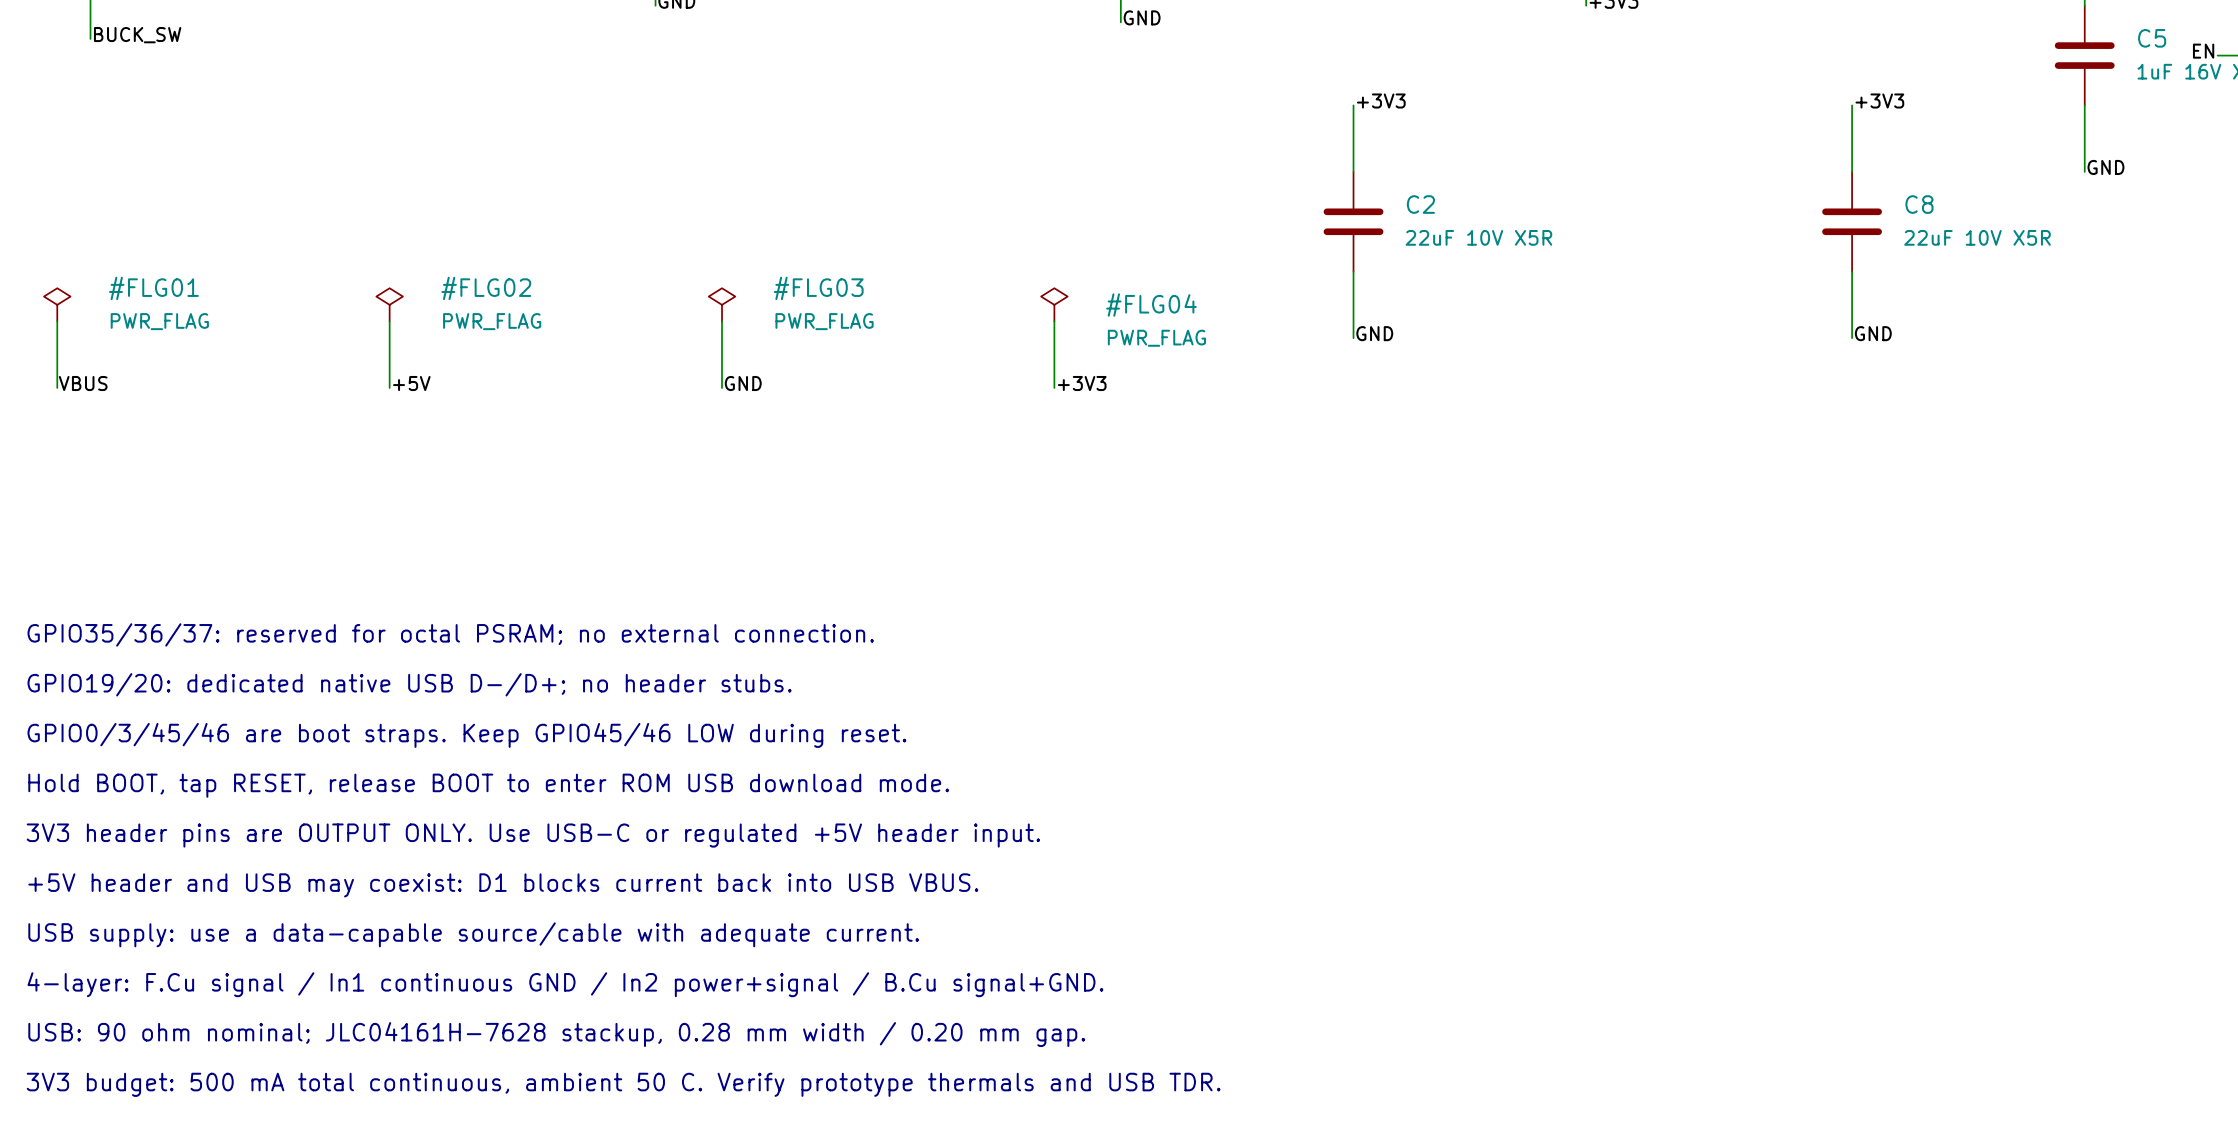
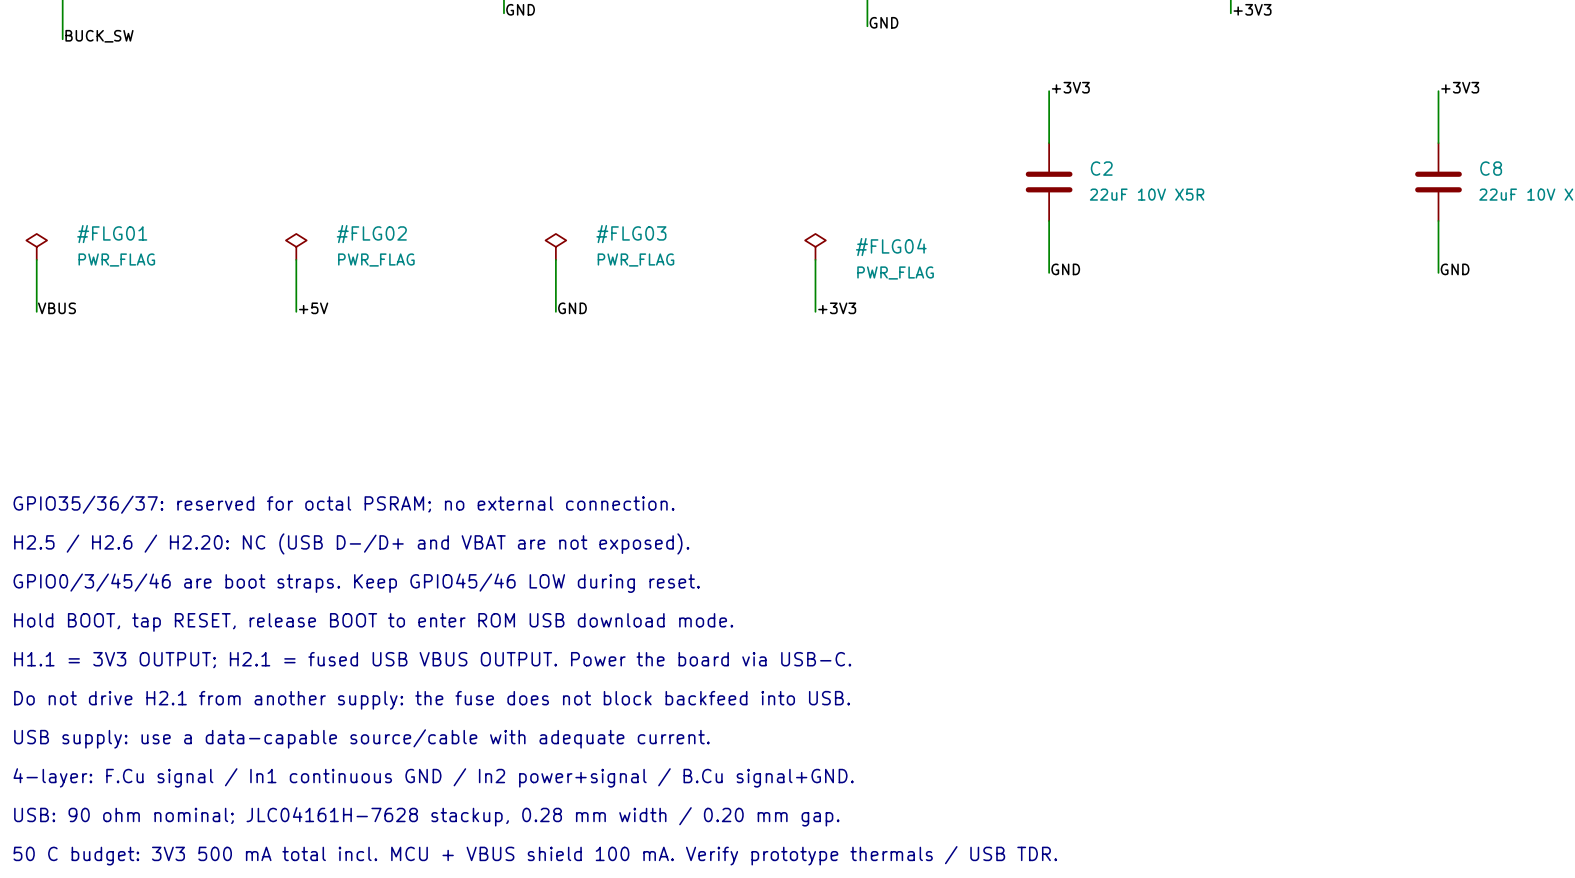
text: GPIO19/20: dedicated native USB D-/D+; no header stubs. (409, 684) -> H2.5 / H2.6 / H2.20: NC (USB D-/D+ and VBAT are not exposed). (351, 543)
text: 3V3 header pins are OUTPUT ONLY. Use USB-C or regulated +5V header input. (533, 835) -> H1.1 = 3V3 OUTPUT; H2.1 = fused USB VBUS OUTPUT. Power the board via USB-C. (432, 660)
text: +5V header and USB may coexist: D1 blocks current back into USB VBUS. (503, 885) -> Do not drive H2.1 from another supply: the fuse does not block backfeed into USB. (432, 700)
text: 3V3 budget: 500 mA total continuous, ambient 50 C. Verify prototype thermals and USB TDR. (623, 1084) -> 50 C budget: 3V3 500 mA total incl. MCU + VBUS shield 100 mA. Verify prototype thermals / USB TDR. (535, 855)

